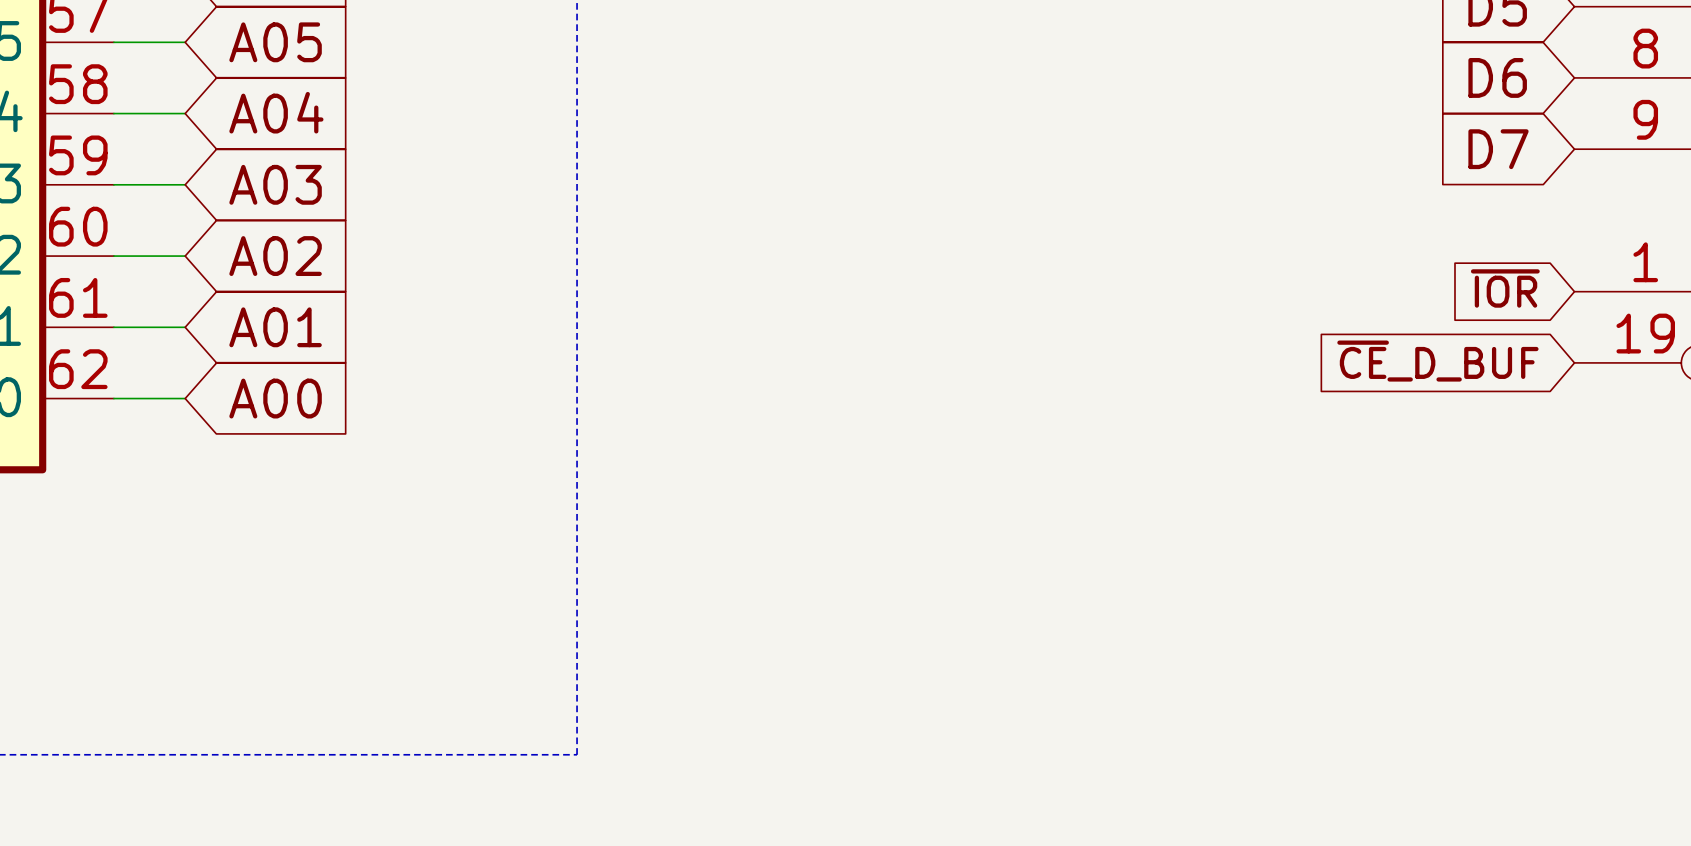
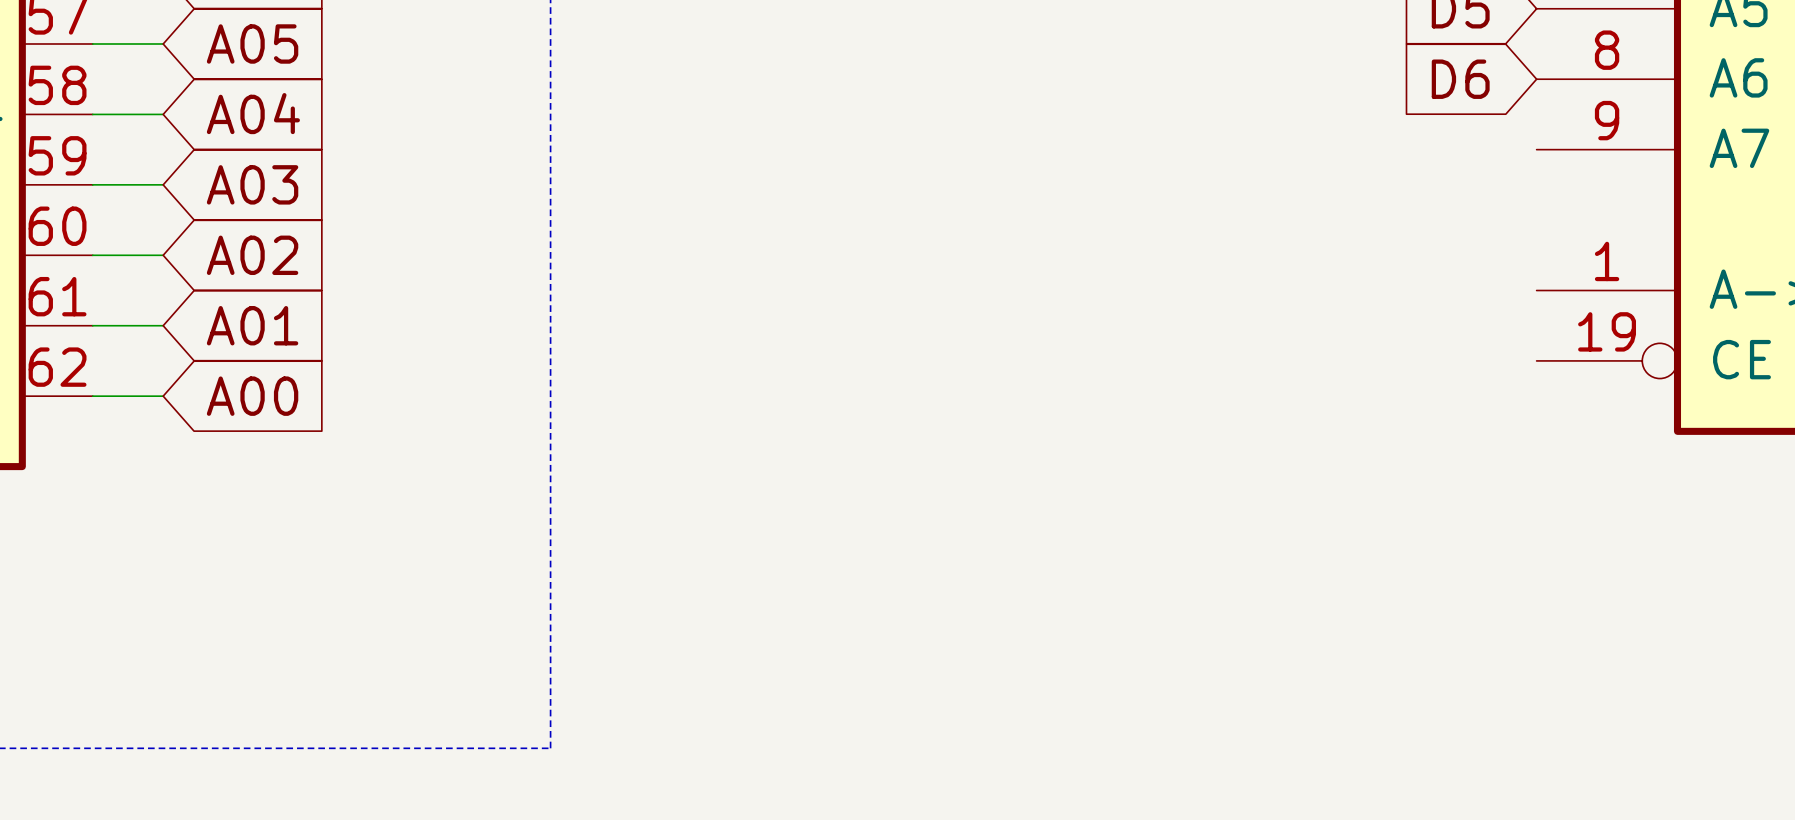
global label: D7 (1498, 149) -> none
global label: ~{IOR} (1505, 288) -> none
global label: ~{CE}_D_BUF (1437, 361) -> none

